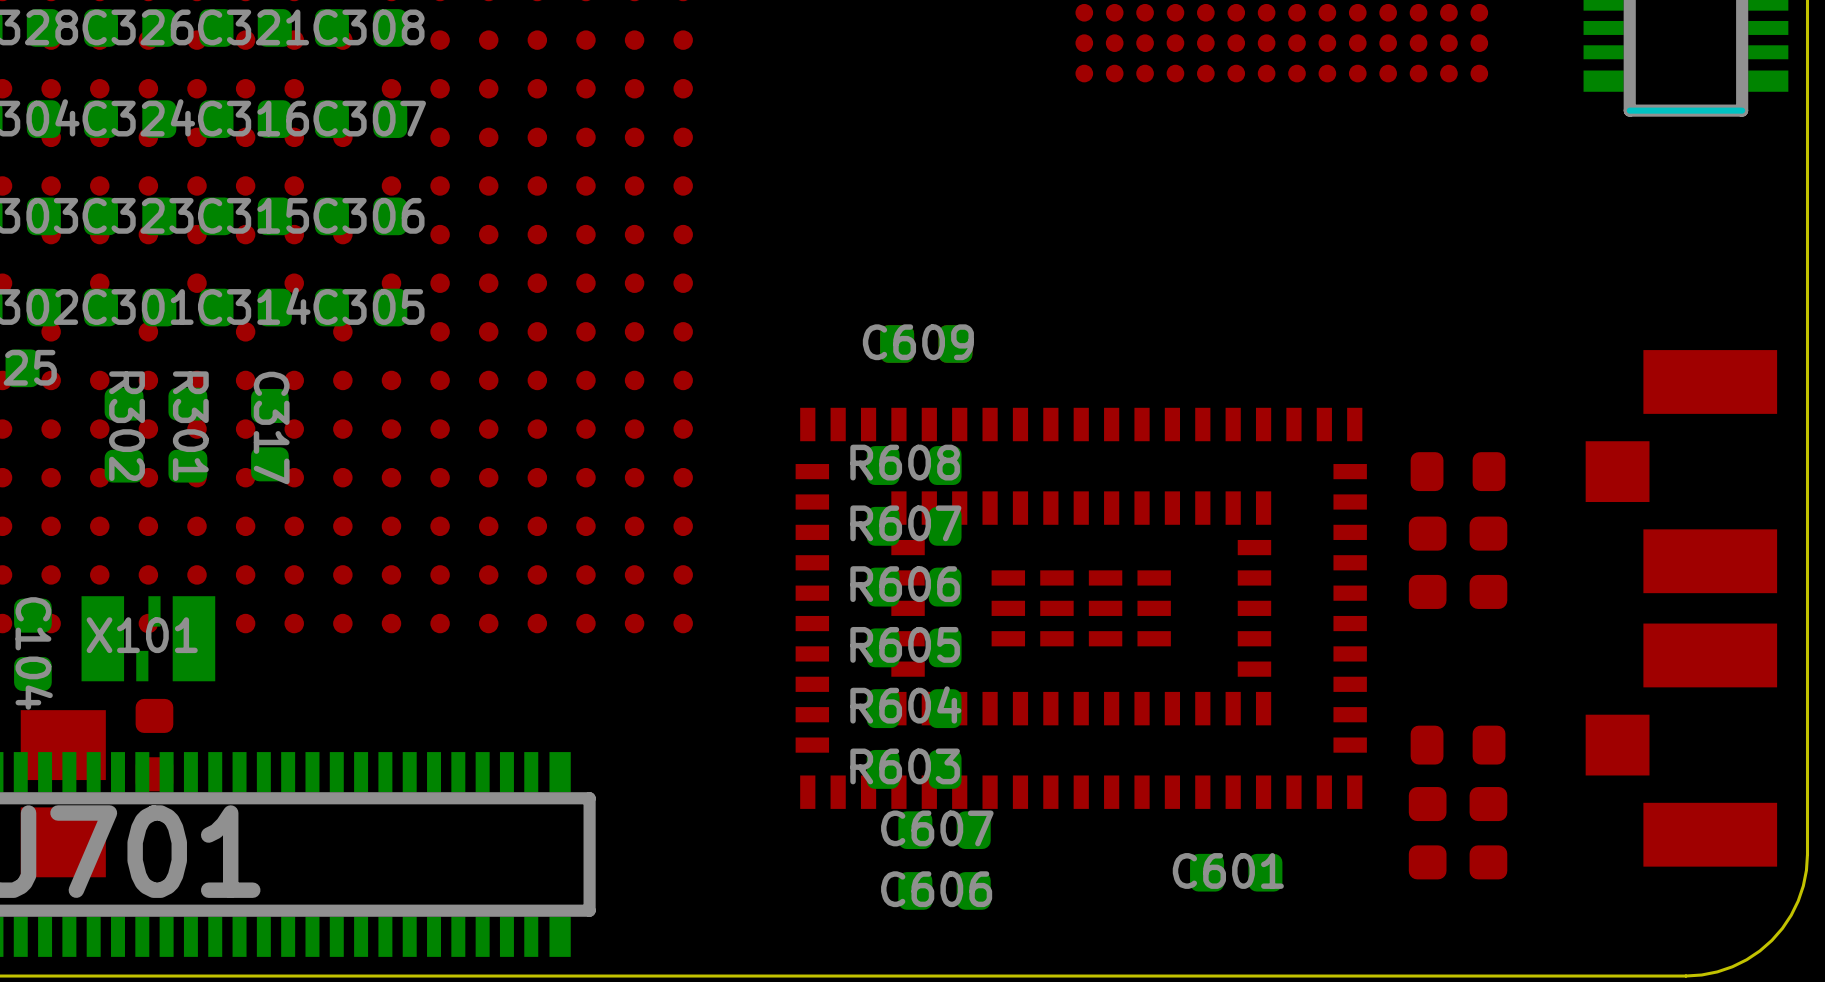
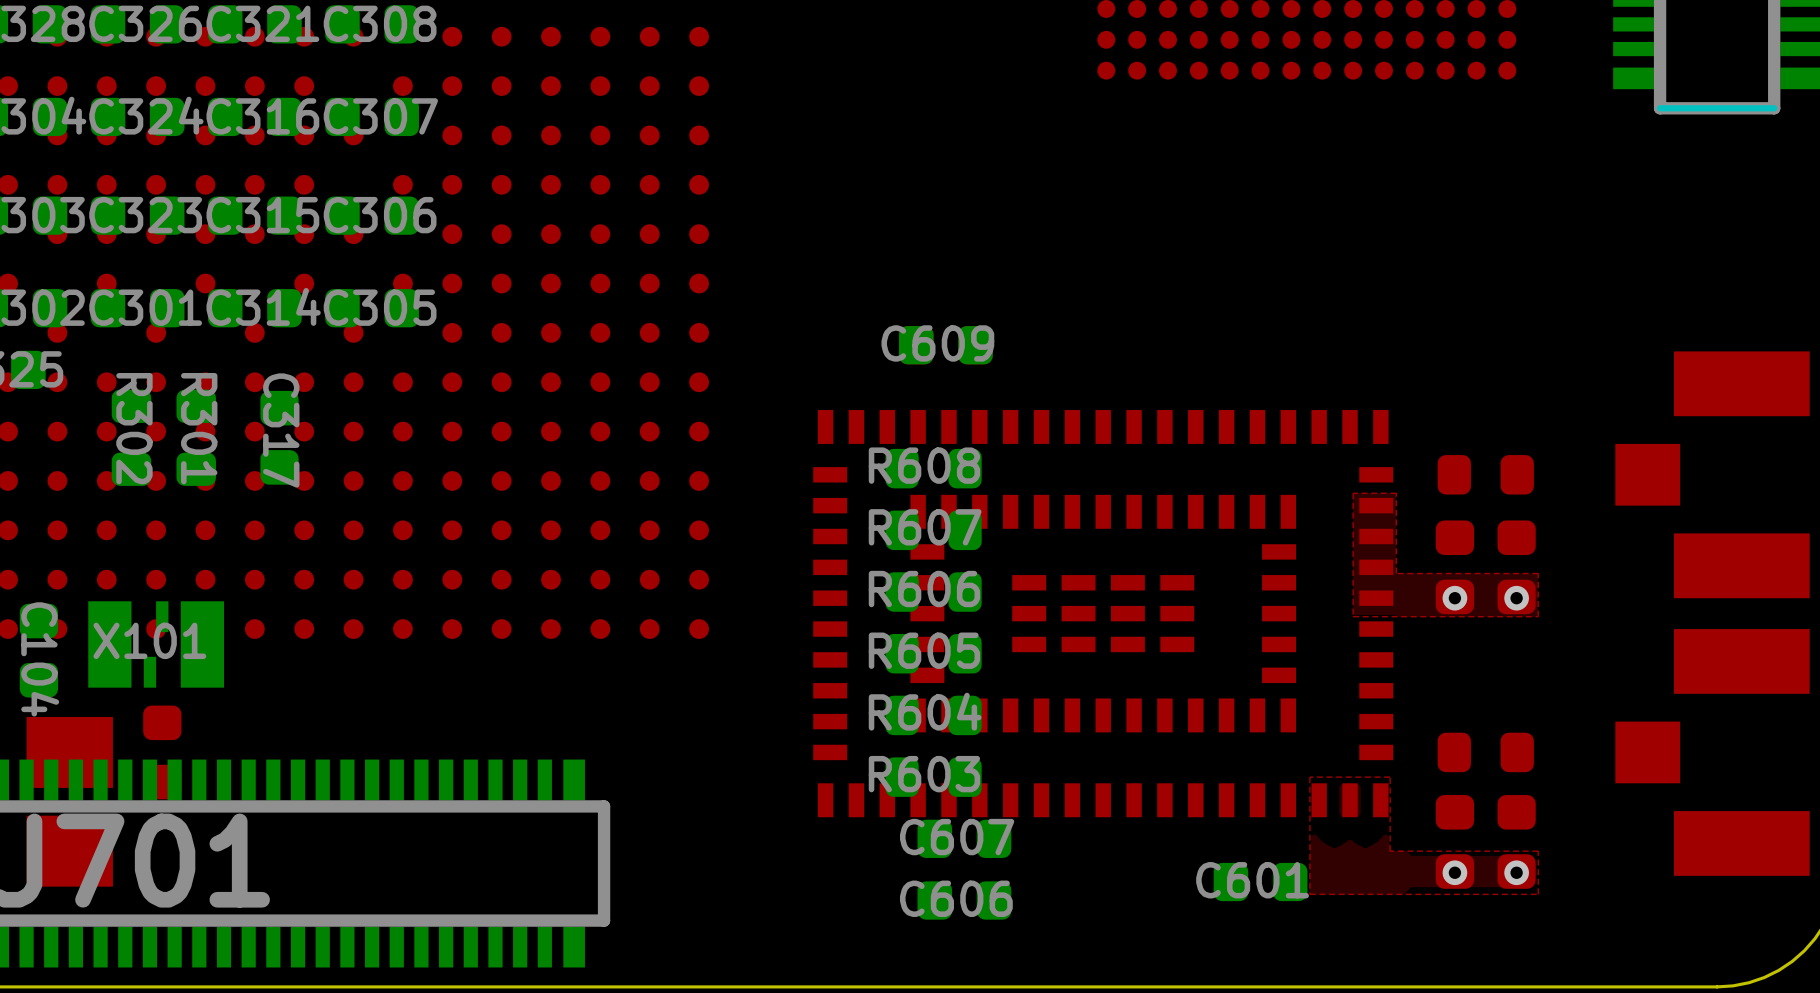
top zone outline: none -> (1396, 493) (1396, 573) (1538, 573) (1538, 616) (1353, 616) (1353, 493) (1396, 493)
via: none -> (1454, 598)
via: none -> (1516, 598)
top zone outline: none -> (1390, 777) (1390, 851) (1538, 851) (1538, 894) (1309, 894) (1309, 777) (1390, 777)
via: none -> (1454, 872)
via: none -> (1516, 872)

